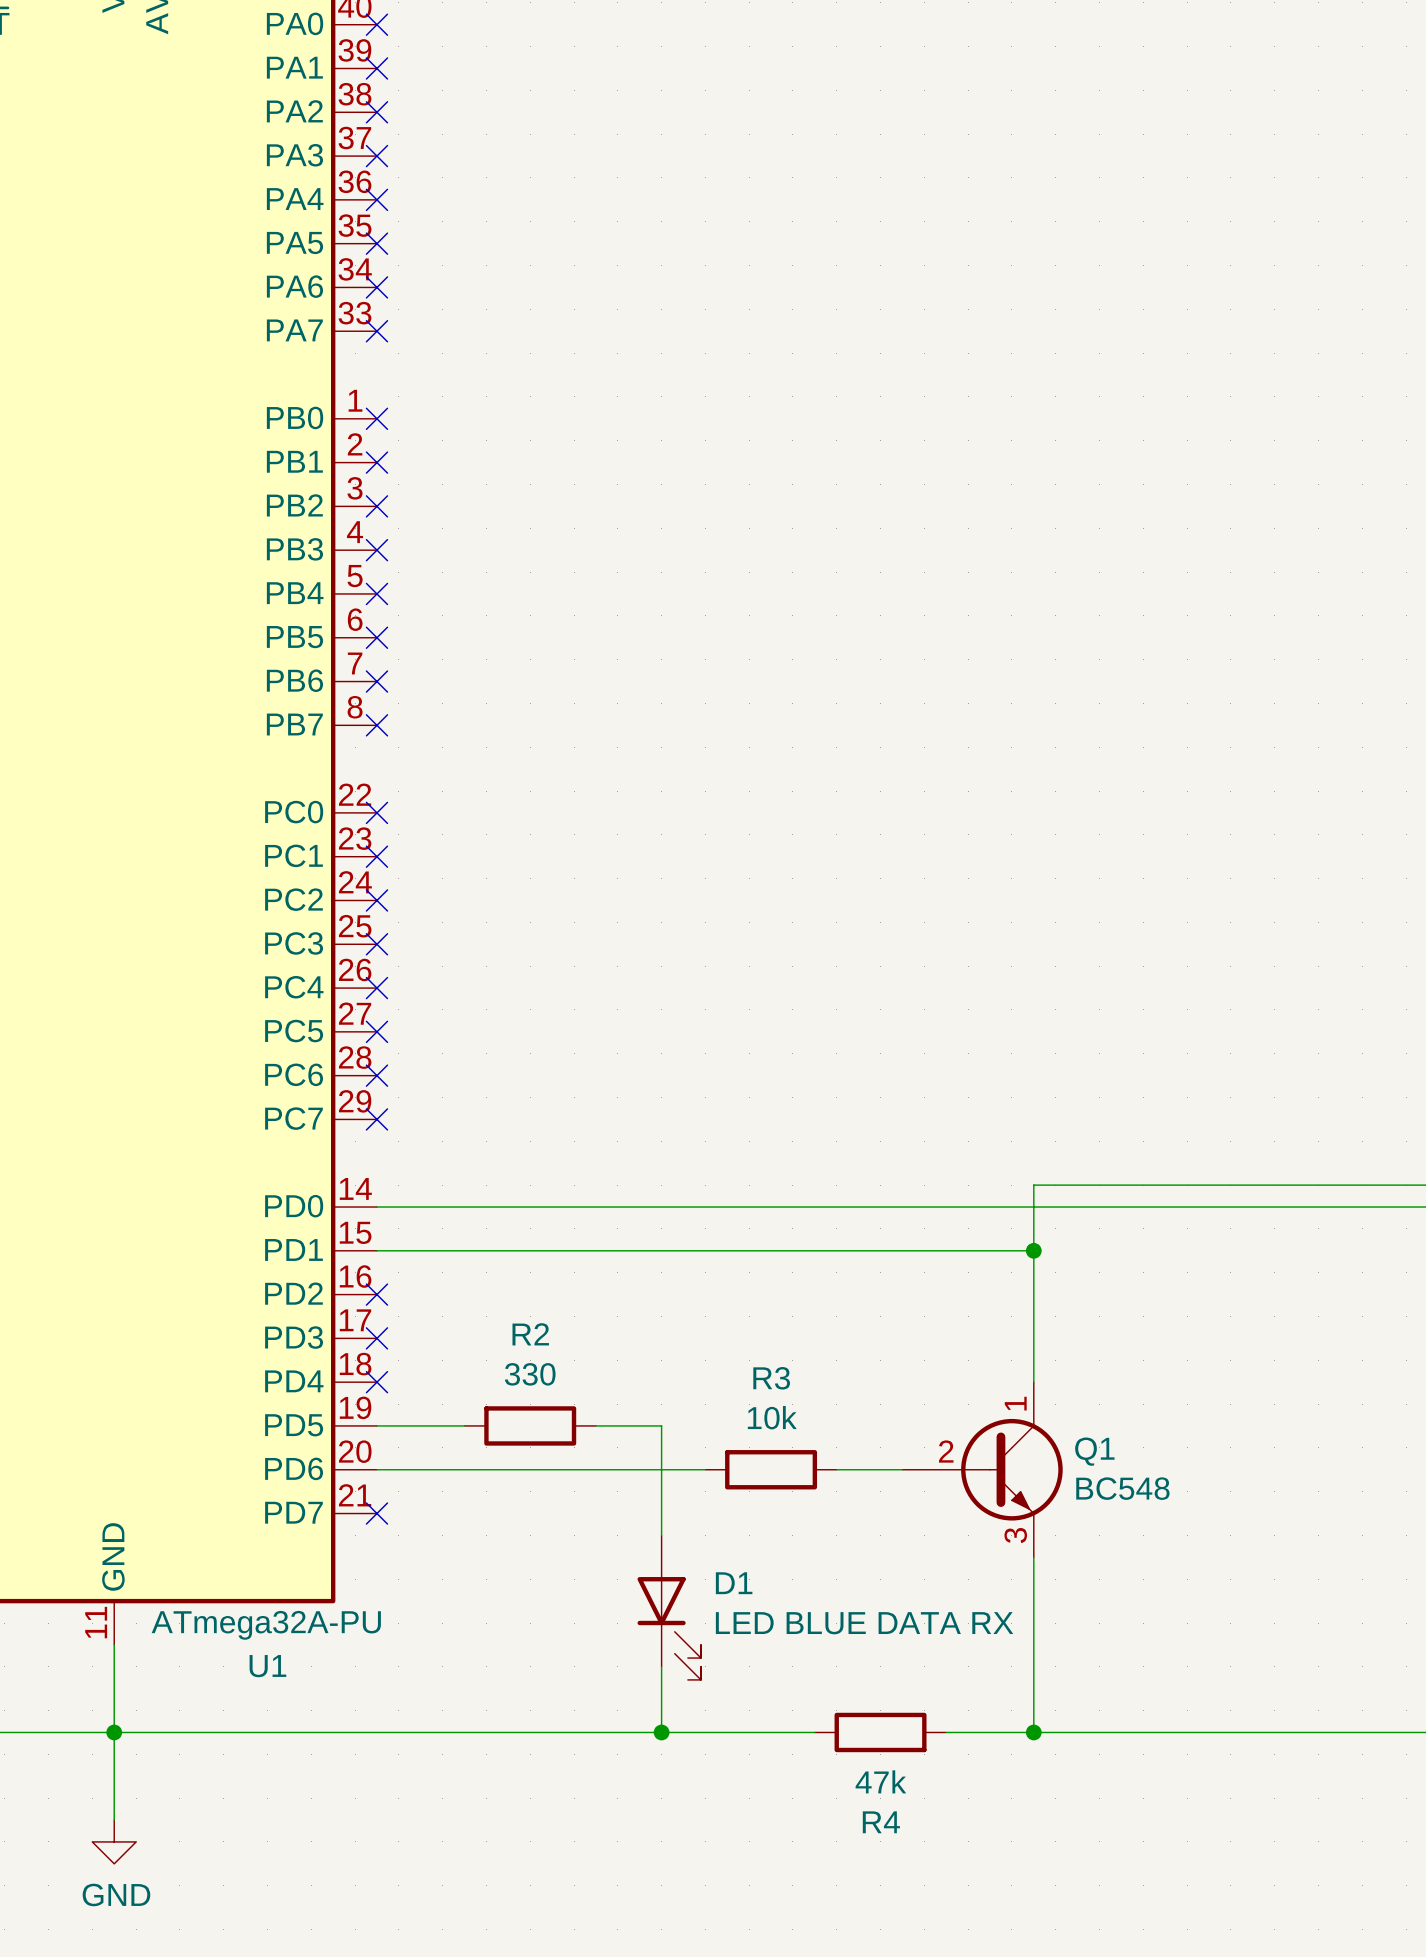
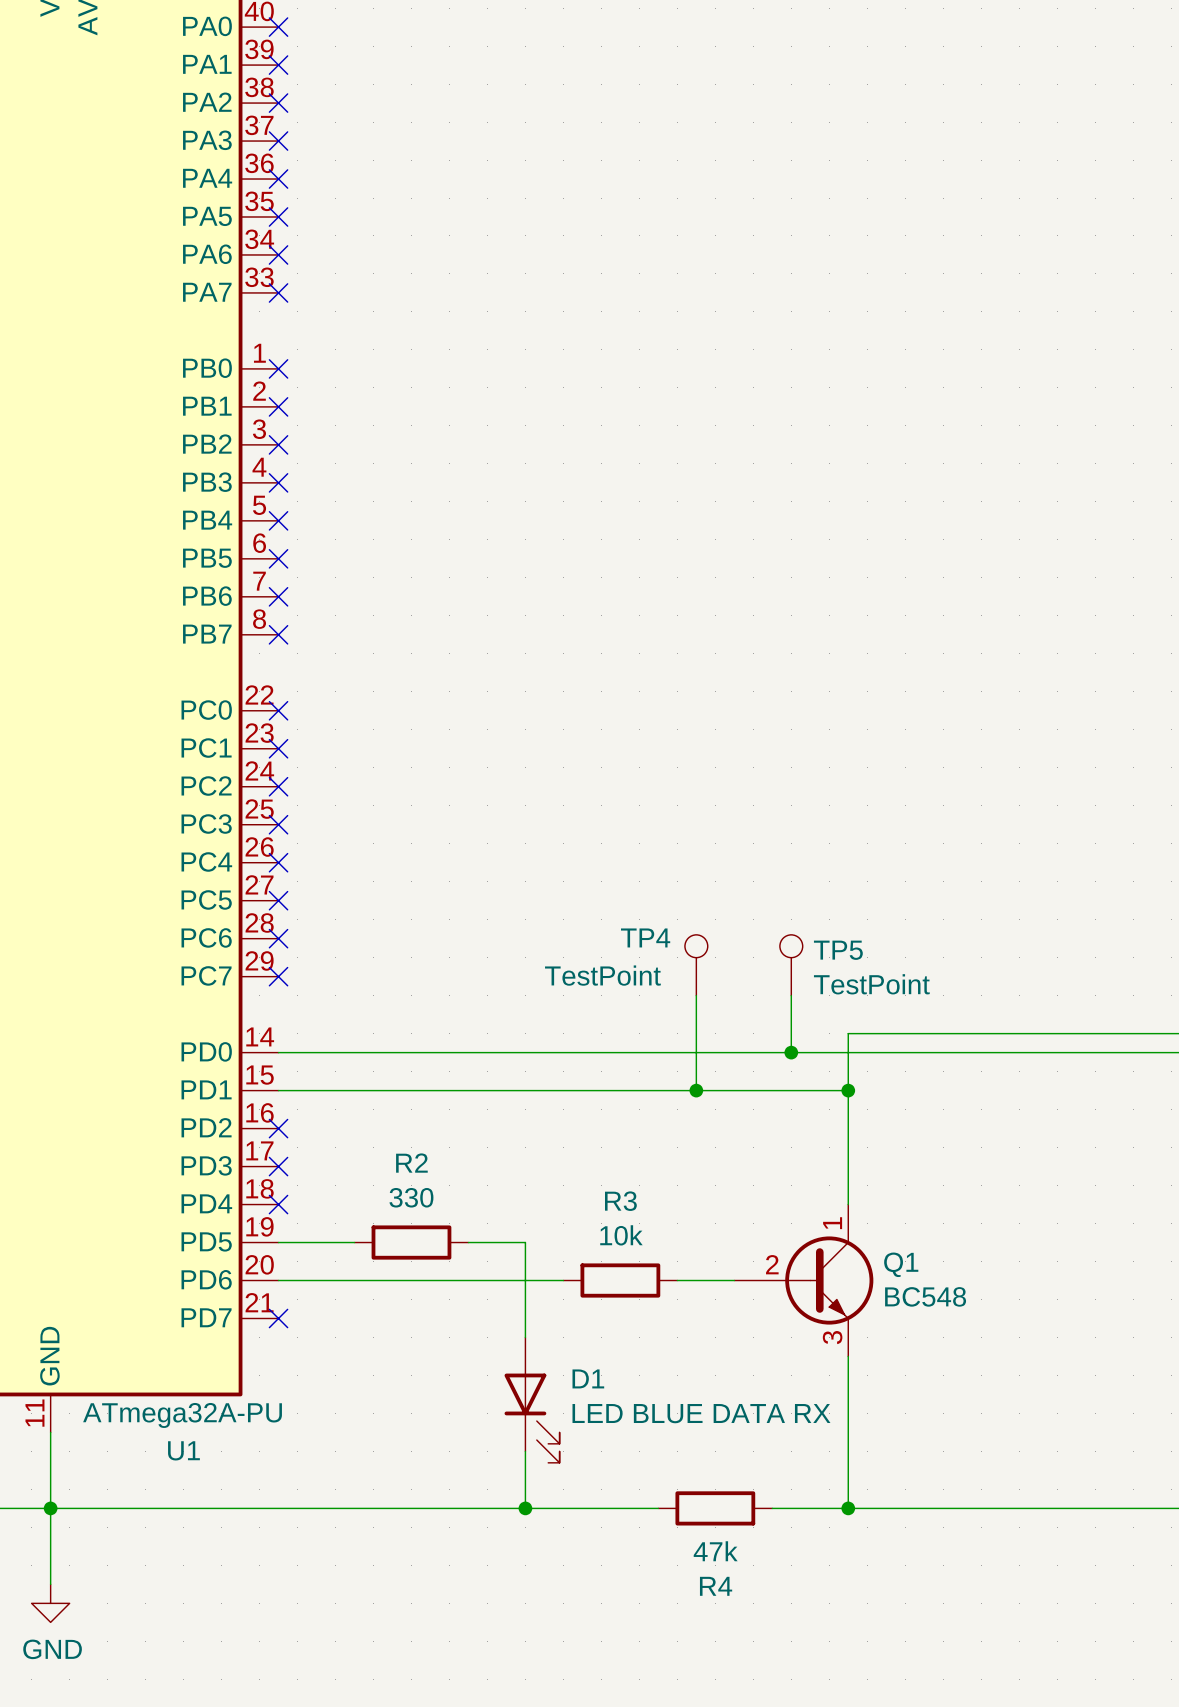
TP4: none -> TestPoint (696, 965)
TP5: none -> TestPoint (791, 965)
wire: none -> (696, 995) (696, 1090)
wire: none -> (791, 995) (791, 1052)
junction: none -> (791, 1052)
junction: none -> (696, 1090)

